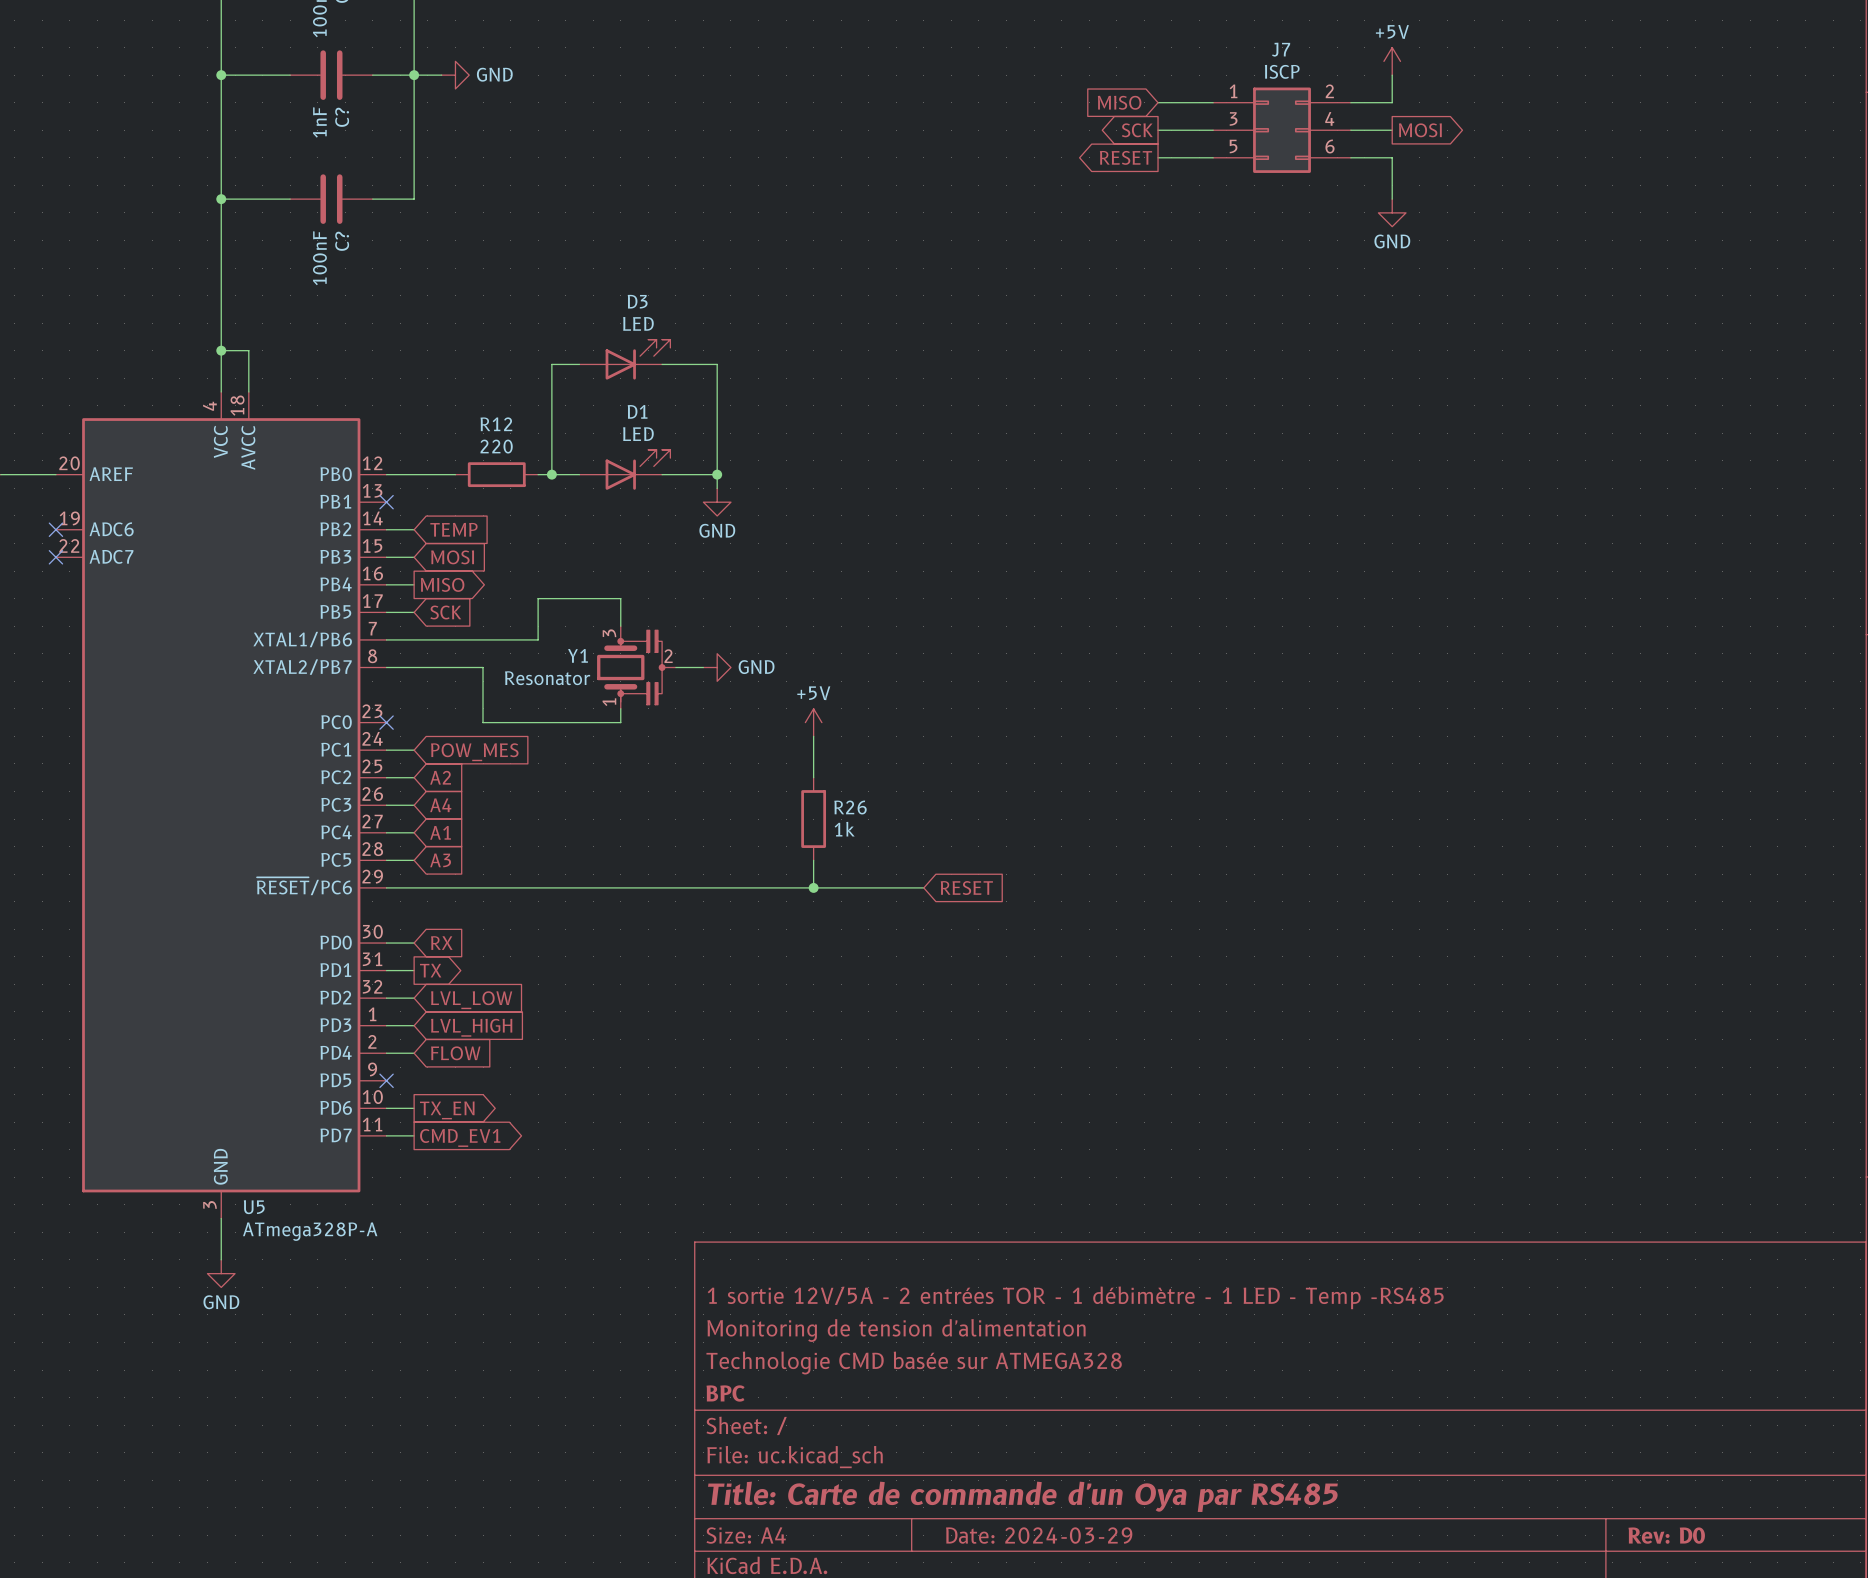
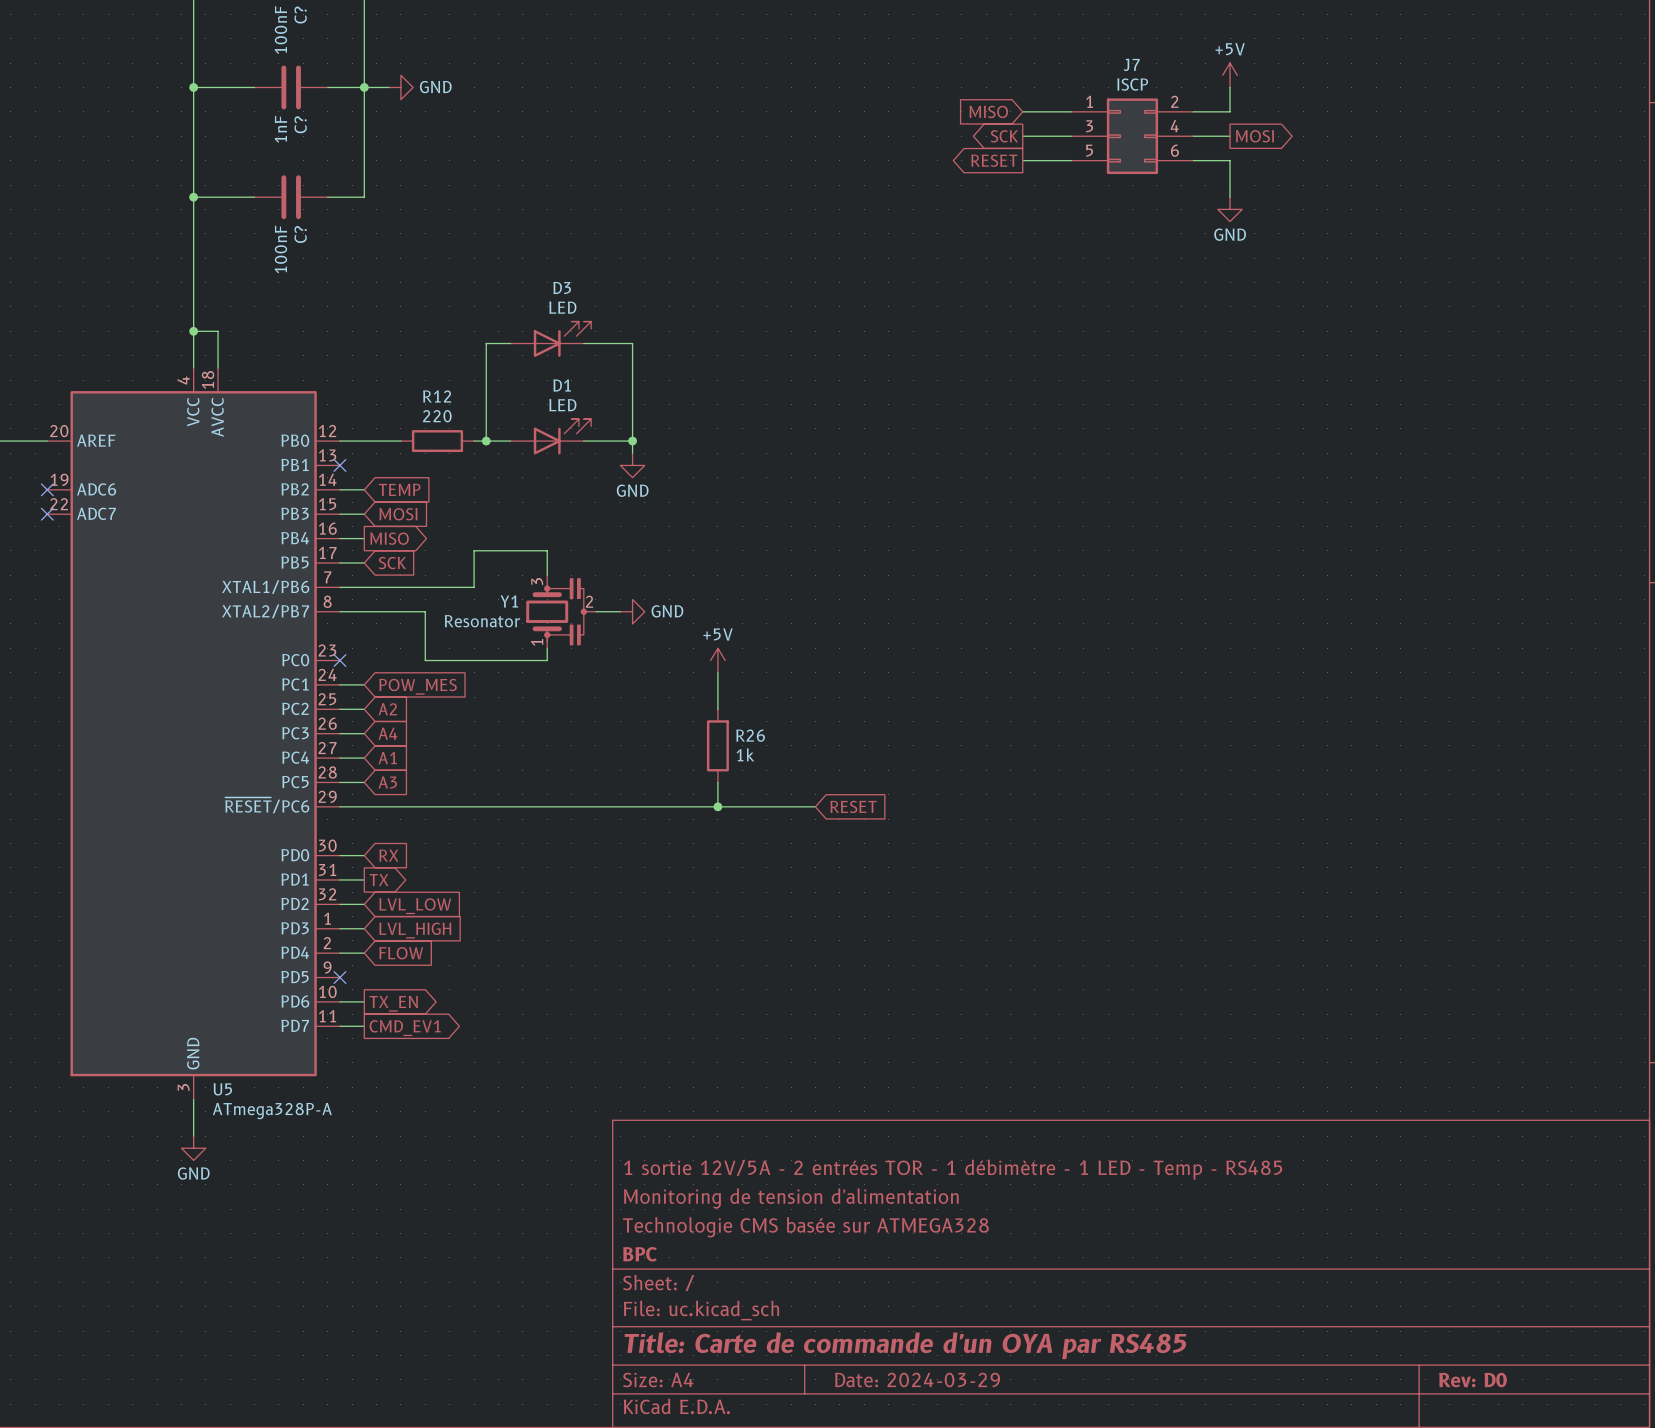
title block: 1 sortie 12V/5A - 2 entrées TOR - 1 débimètre - 1 LED - Temp -RS485 (1075, 1297) -> 1 sortie 12V/5A - 2 entrées TOR - 1 débimètre - 1 LED - Temp - RS485 (953, 1169)
title block: Technologie CMD basée sur ATMEGA328 (914, 1363) -> Technologie CMS basée sur ATMEGA328 (805, 1227)
title block: Title: Carte de commande d'un Oya par RS485 (1022, 1496) -> Title: Carte de commande d'un OYA par RS485 (905, 1345)

